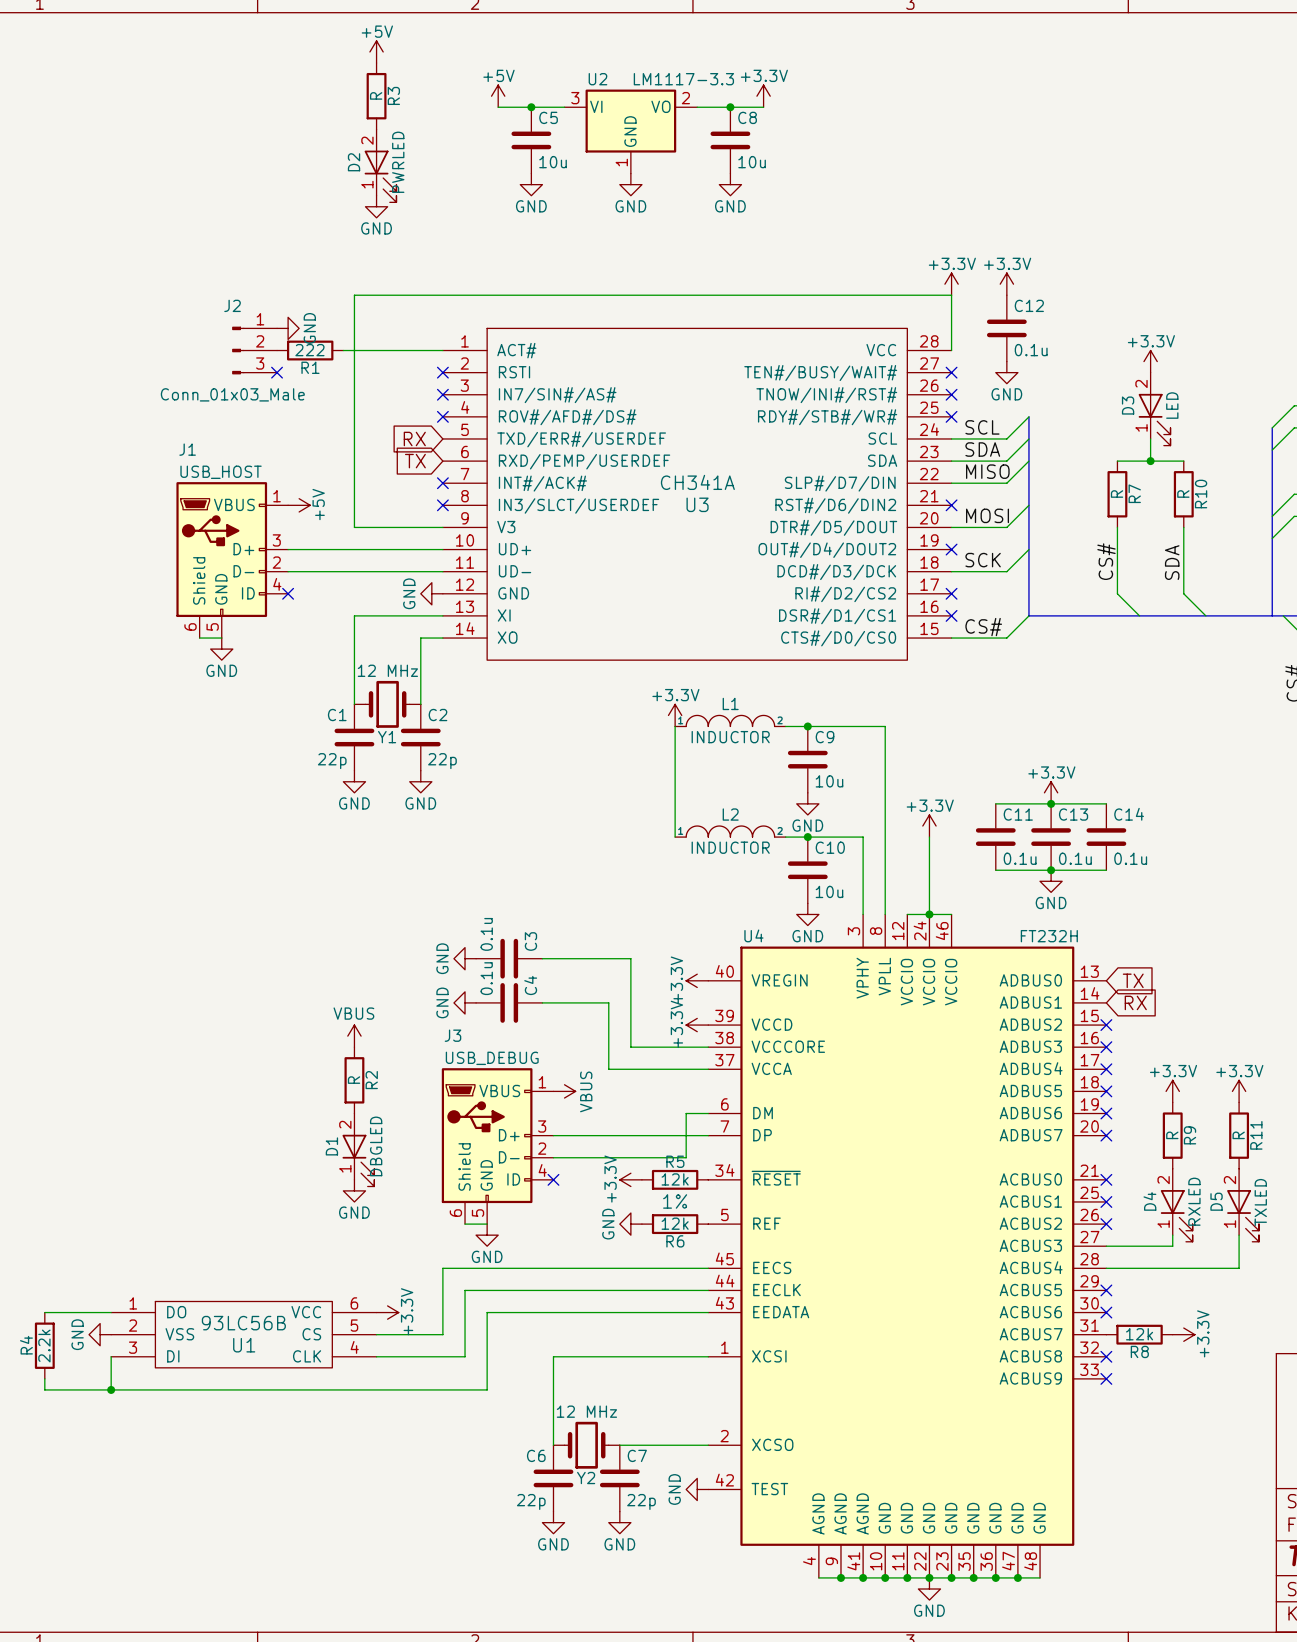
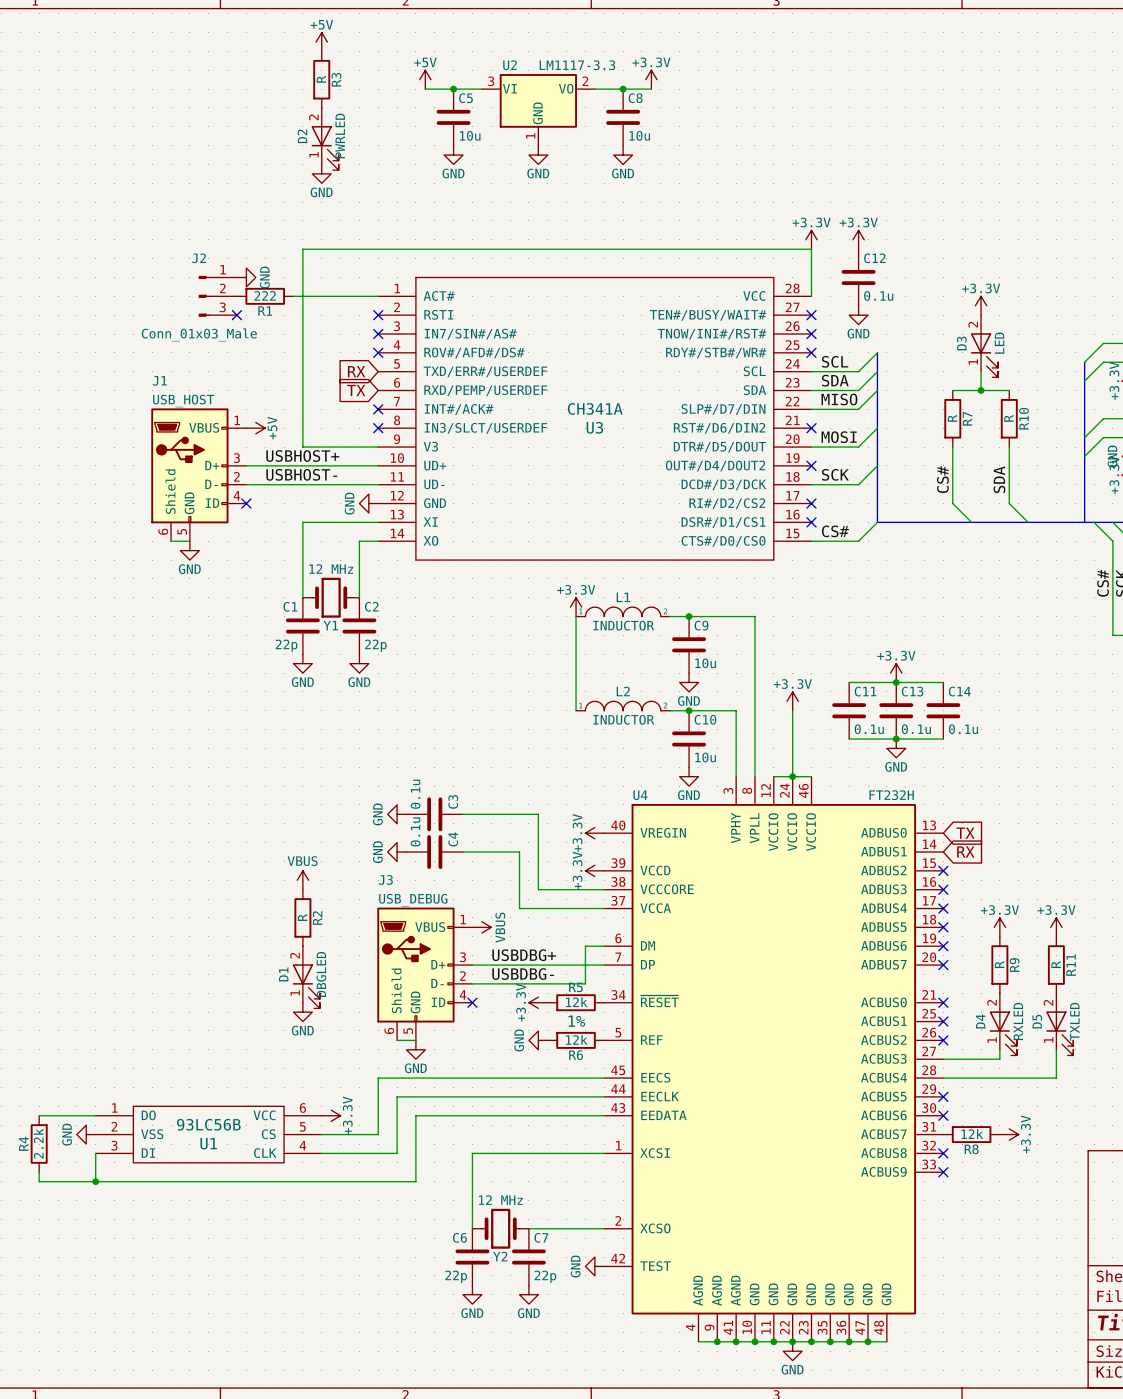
label: none -> USBHOST+ (302, 456)
label: none -> USBHOST- (301, 474)
label: none -> USBDBG+ (524, 955)
label: none -> USBDBG- (523, 974)

